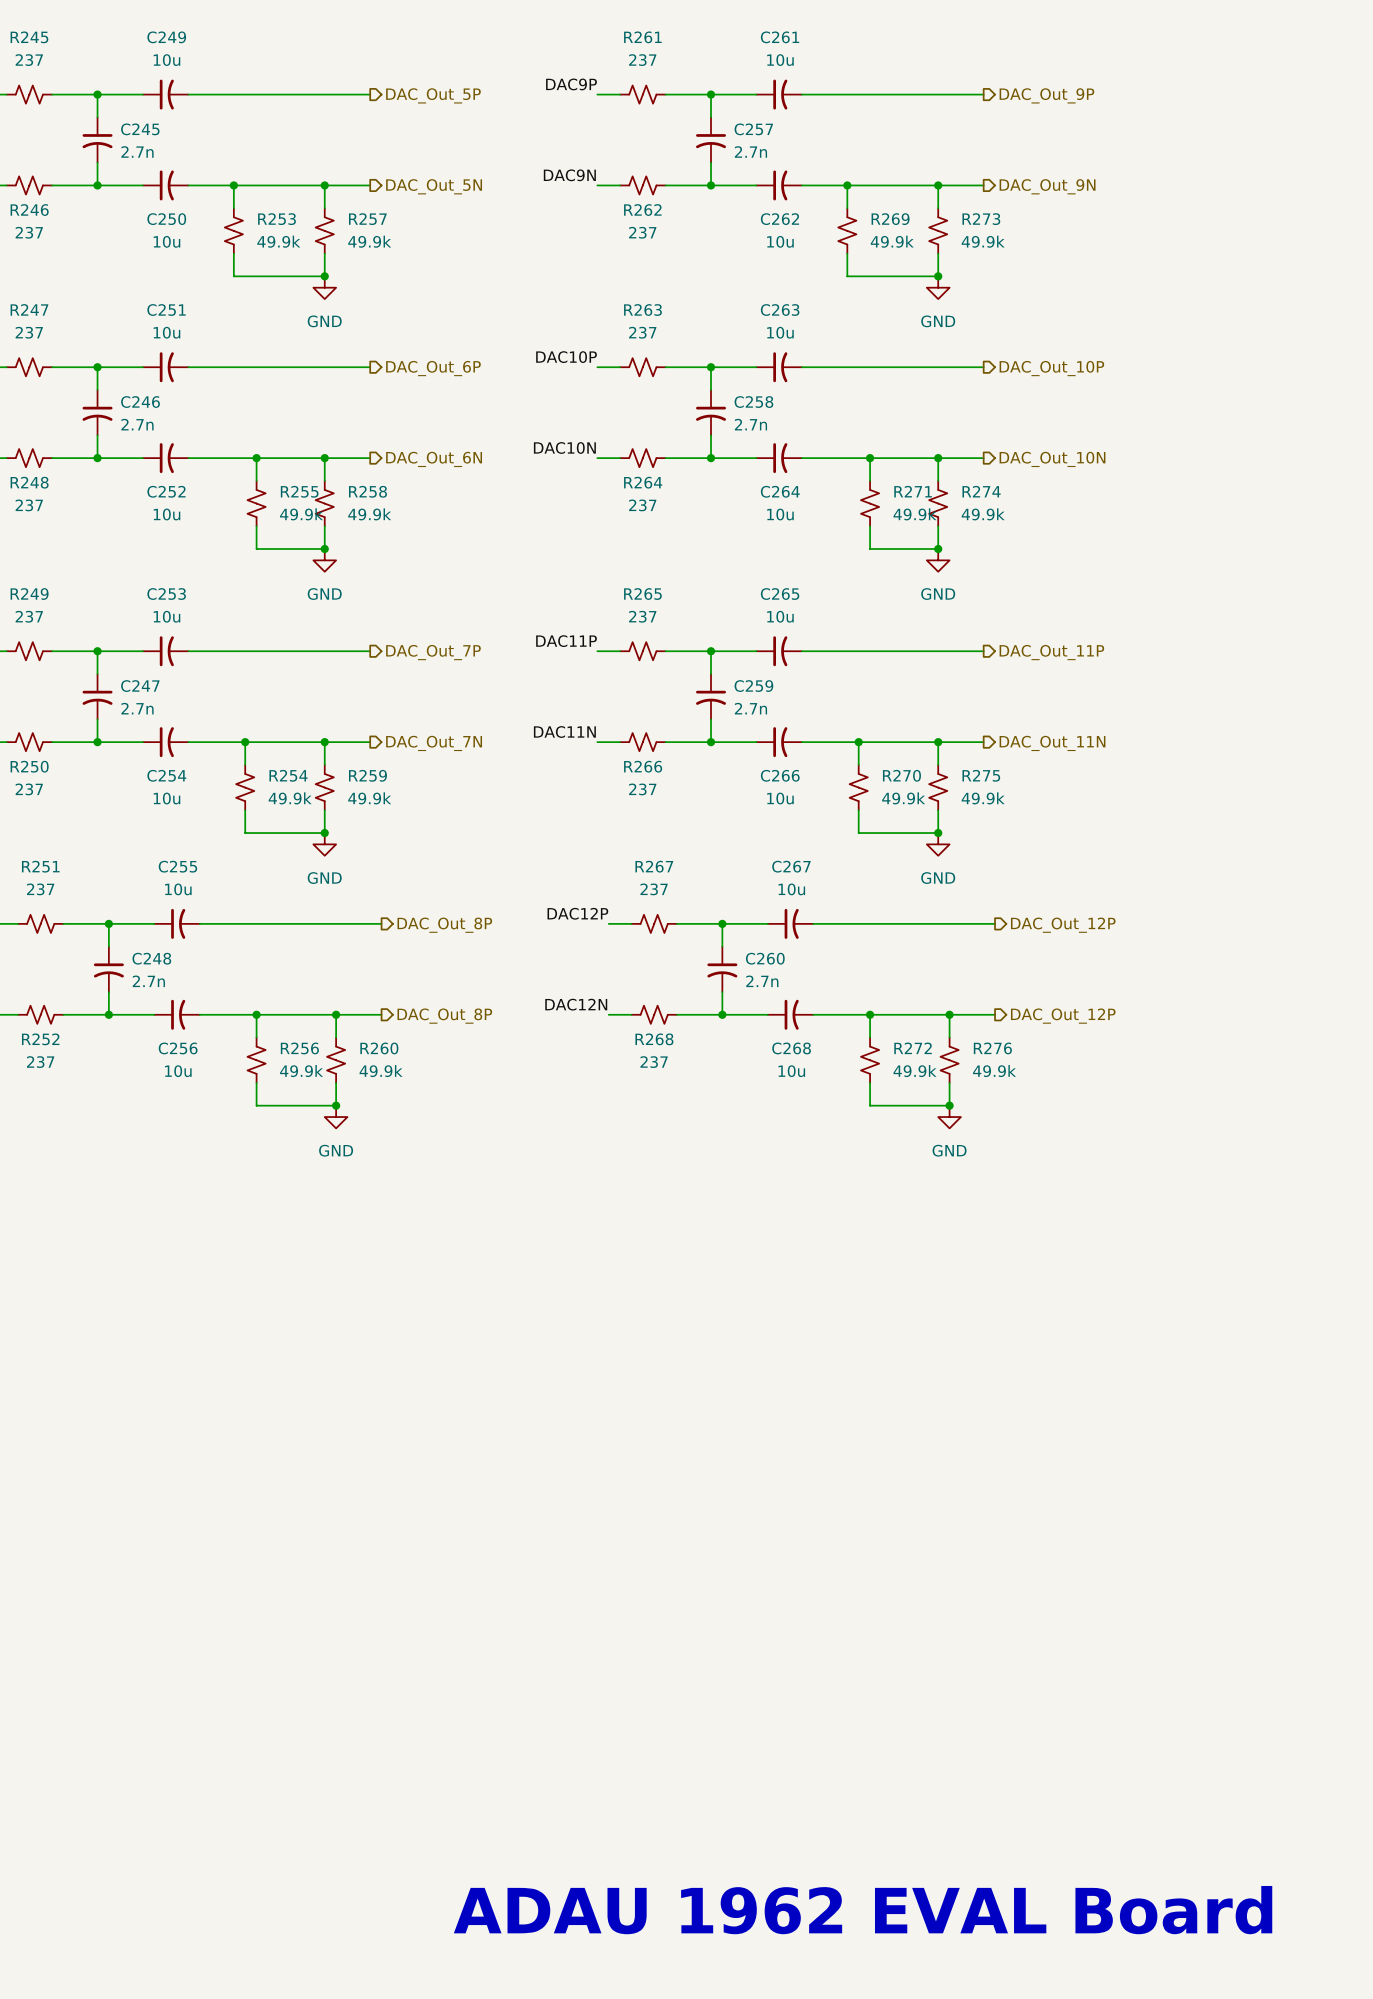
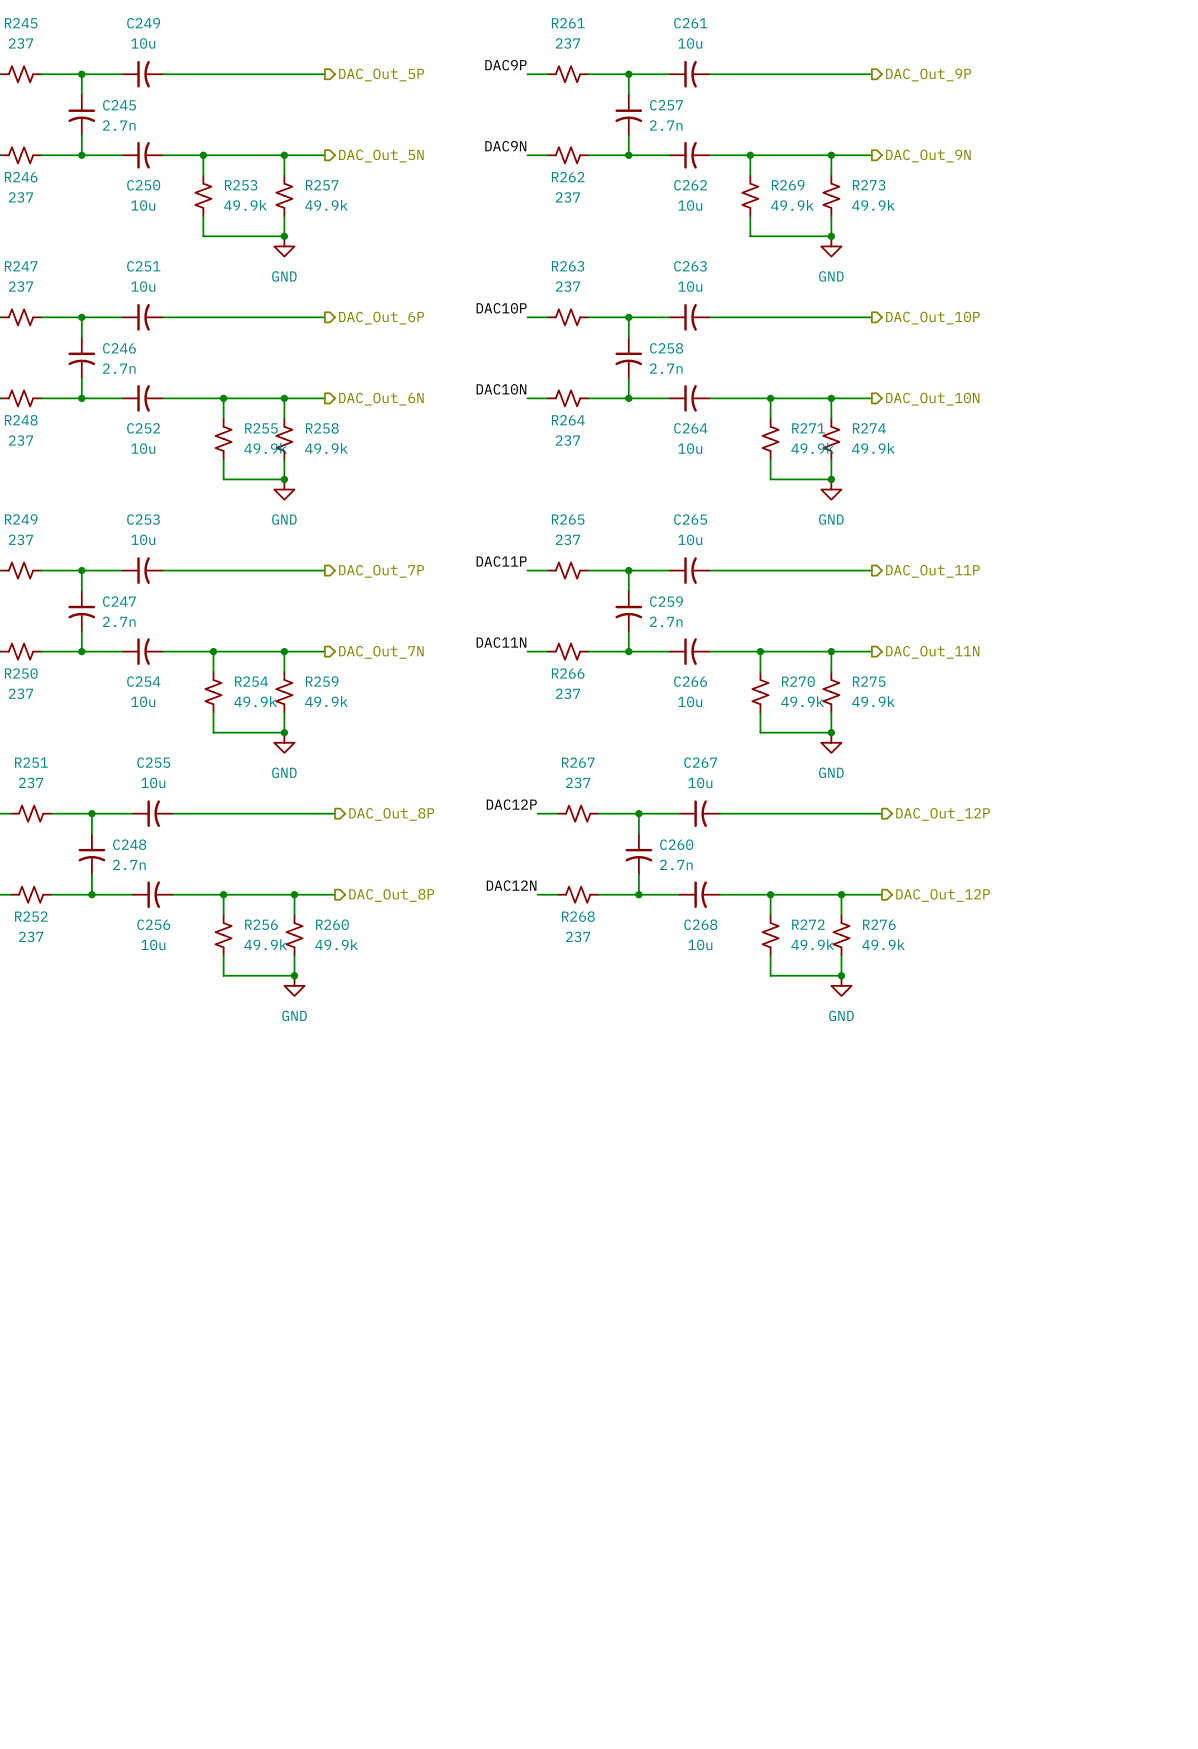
text: ADAU 1962 EVAL Board (863, 1910) -> none

